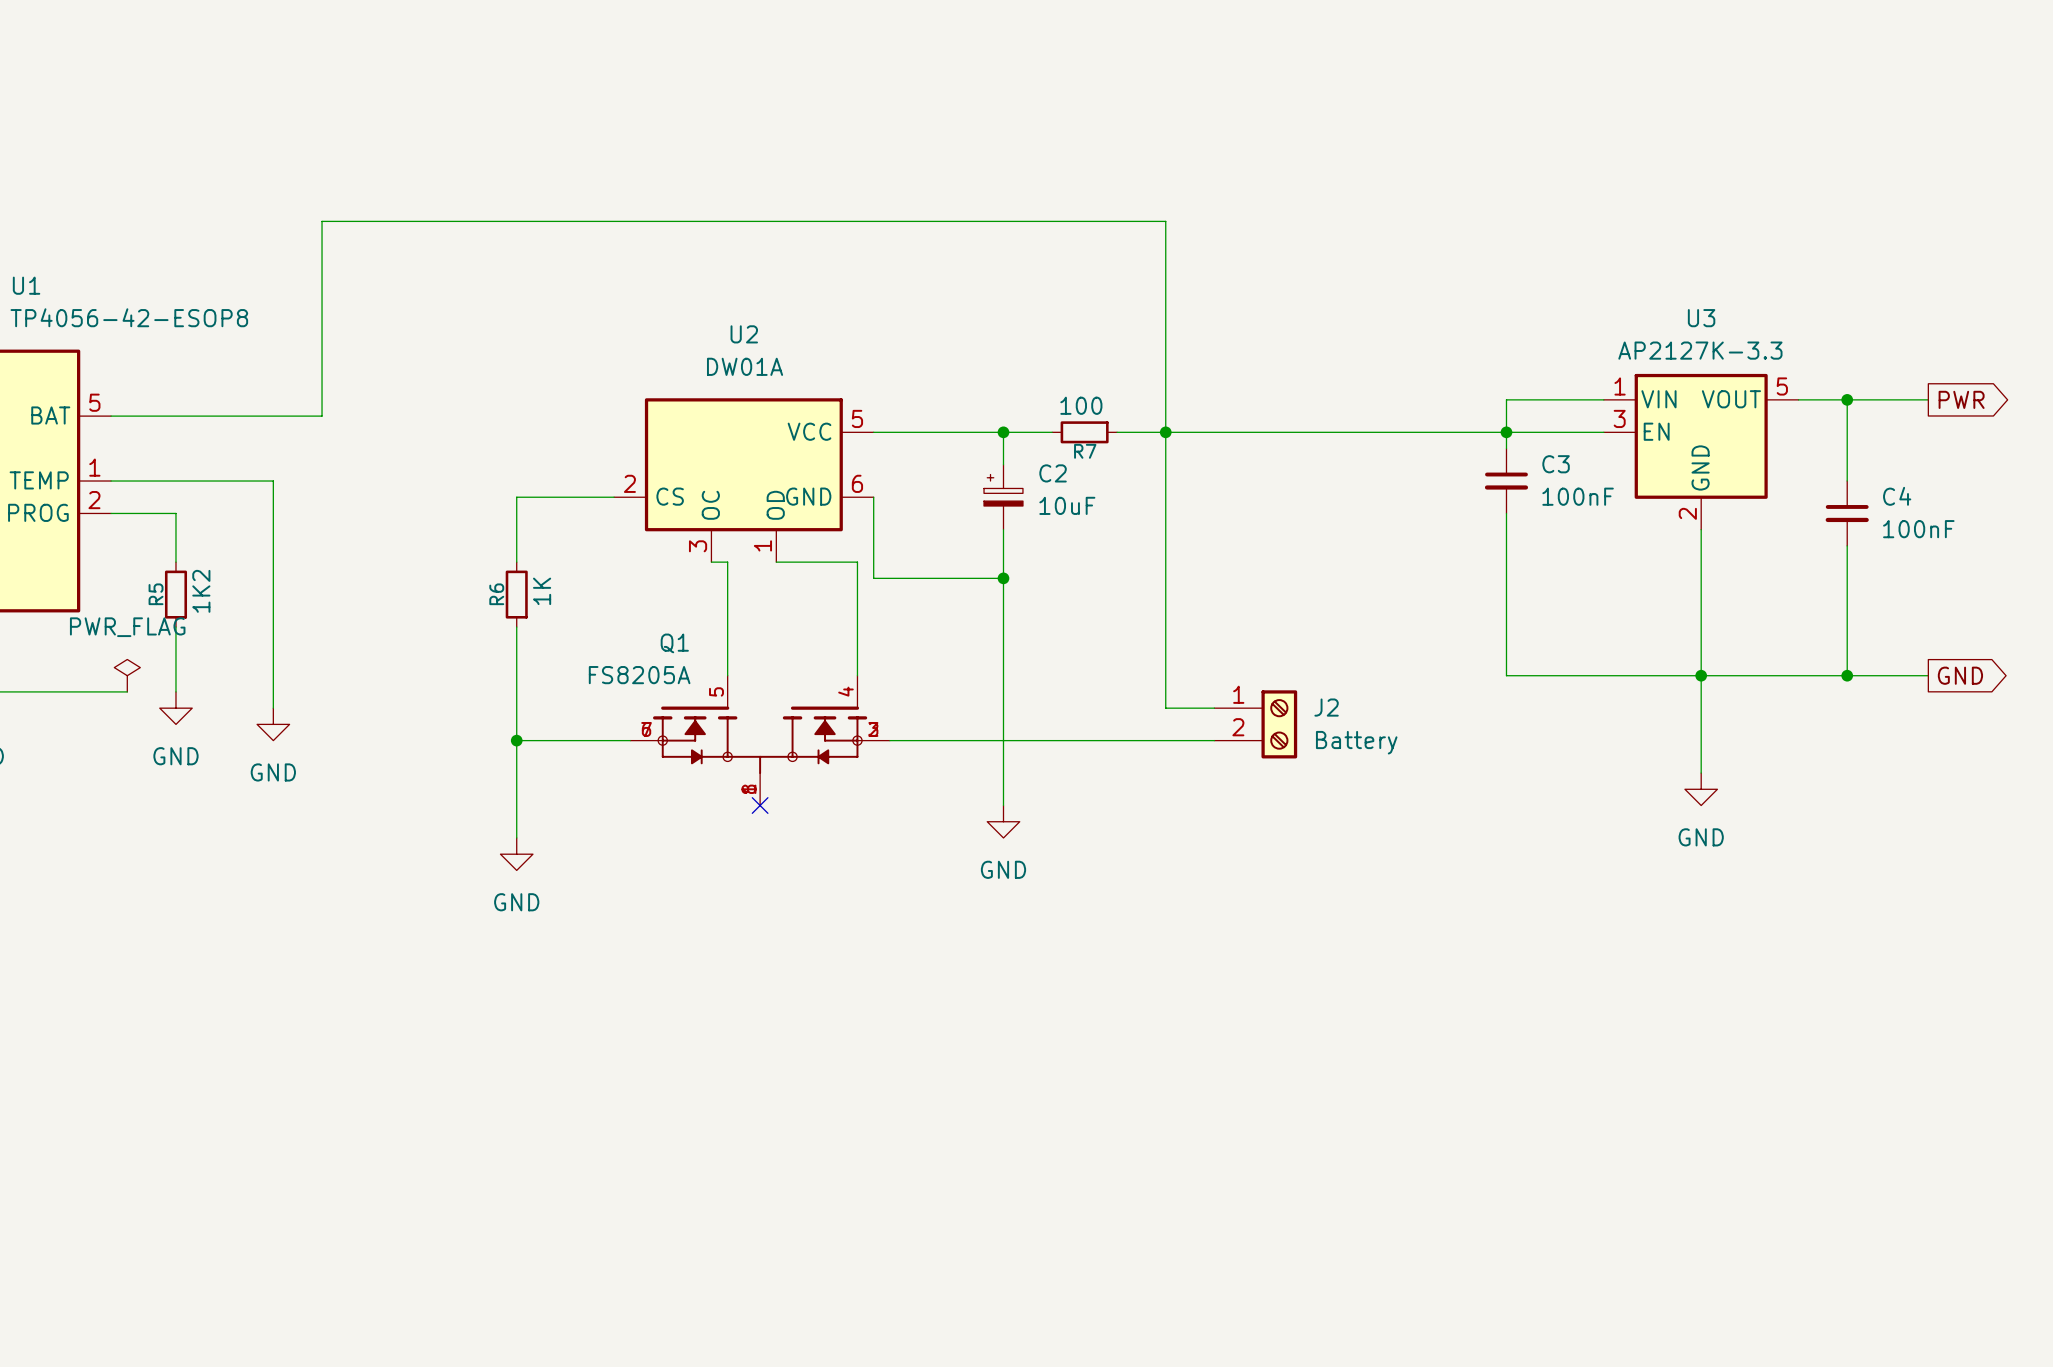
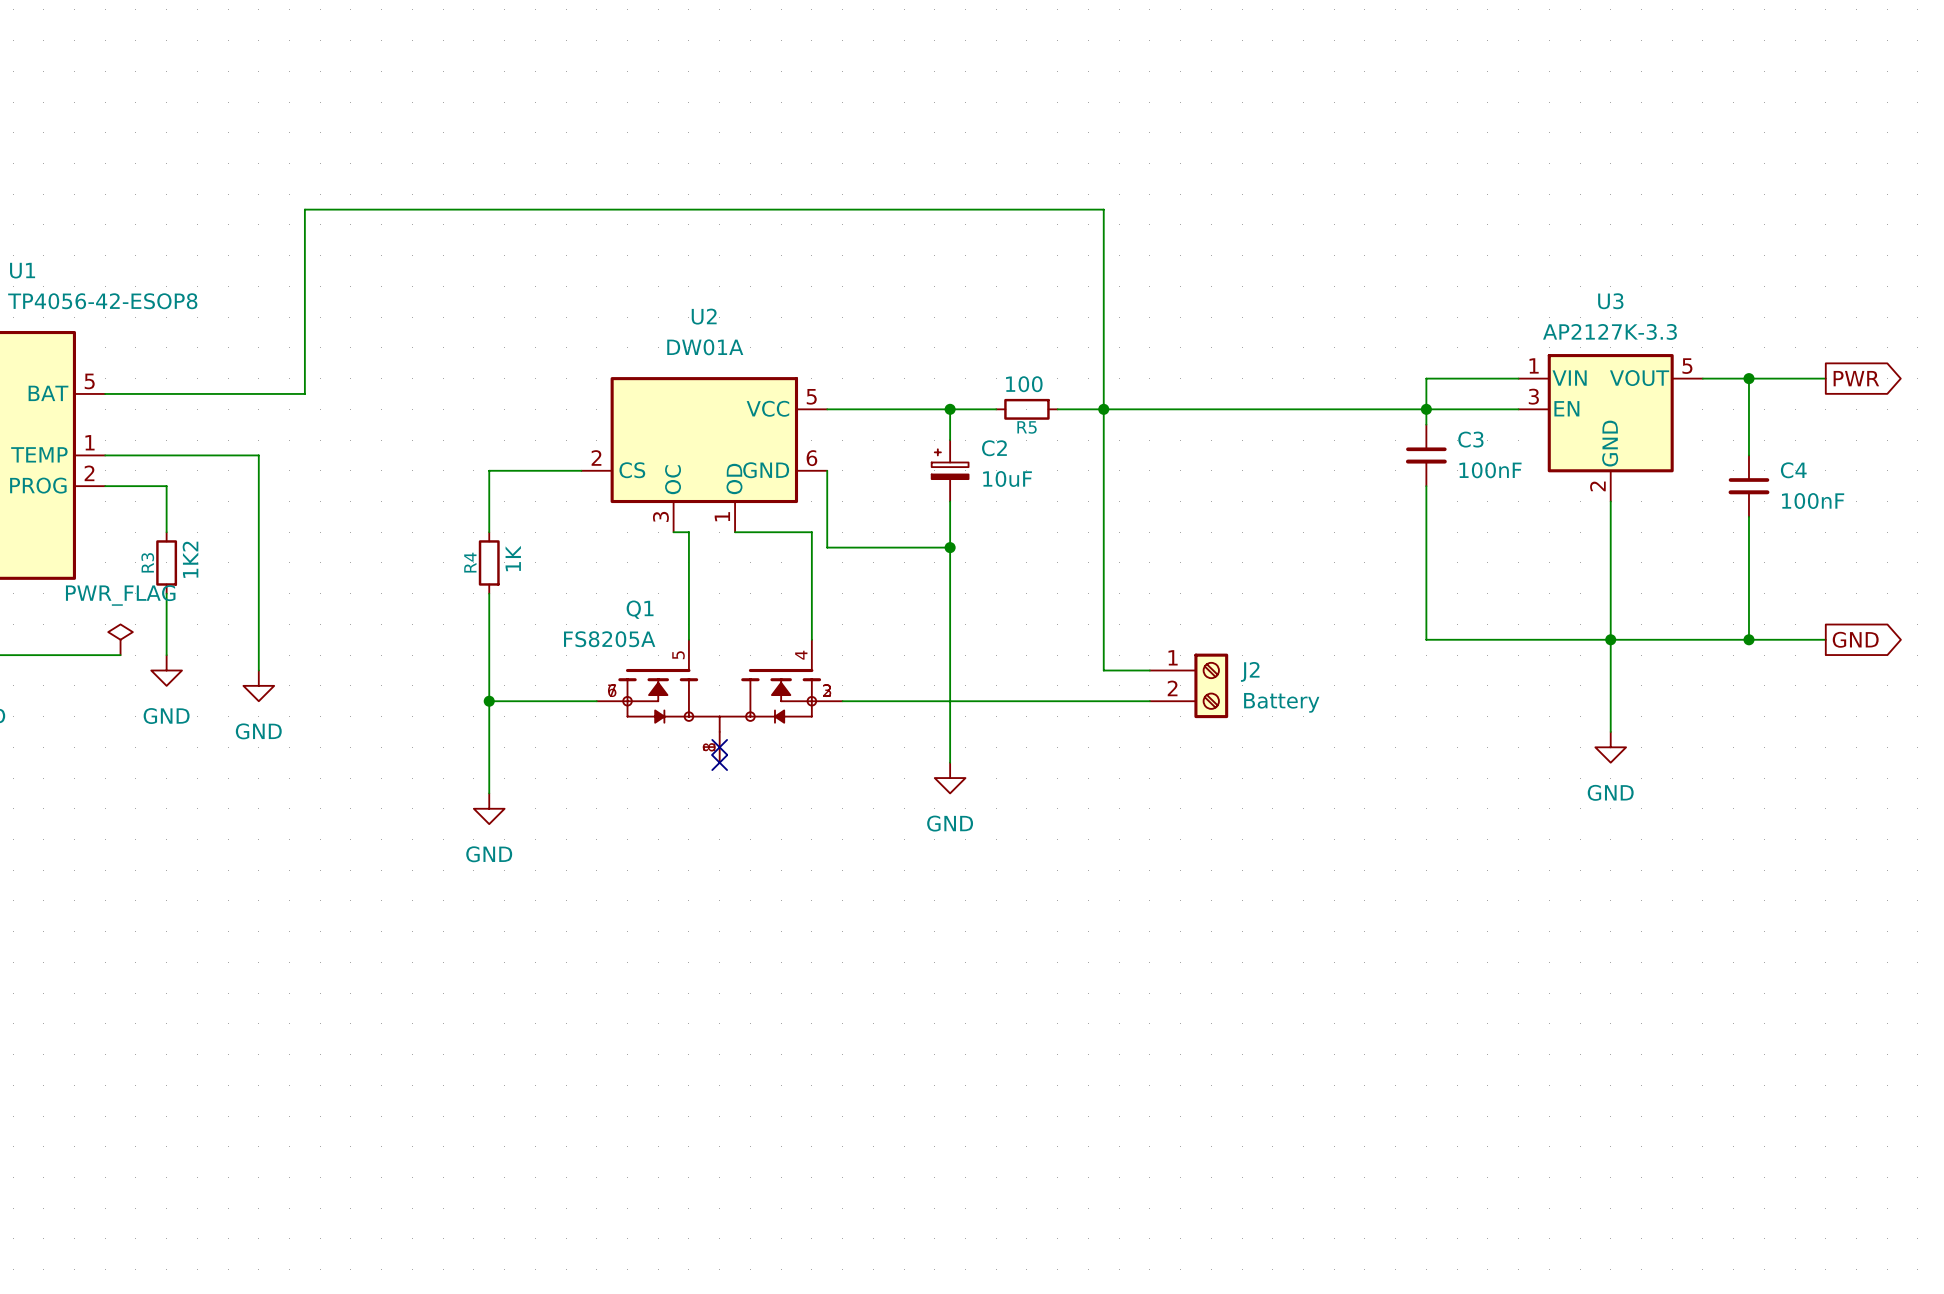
R7 name: R7 (1085, 451) -> R5 (1027, 427)
R5 name: R5 (156, 594) -> R3 (147, 562)
R6 name: R6 (496, 594) -> R4 (470, 562)
no-connect mark: none -> (719, 747)

